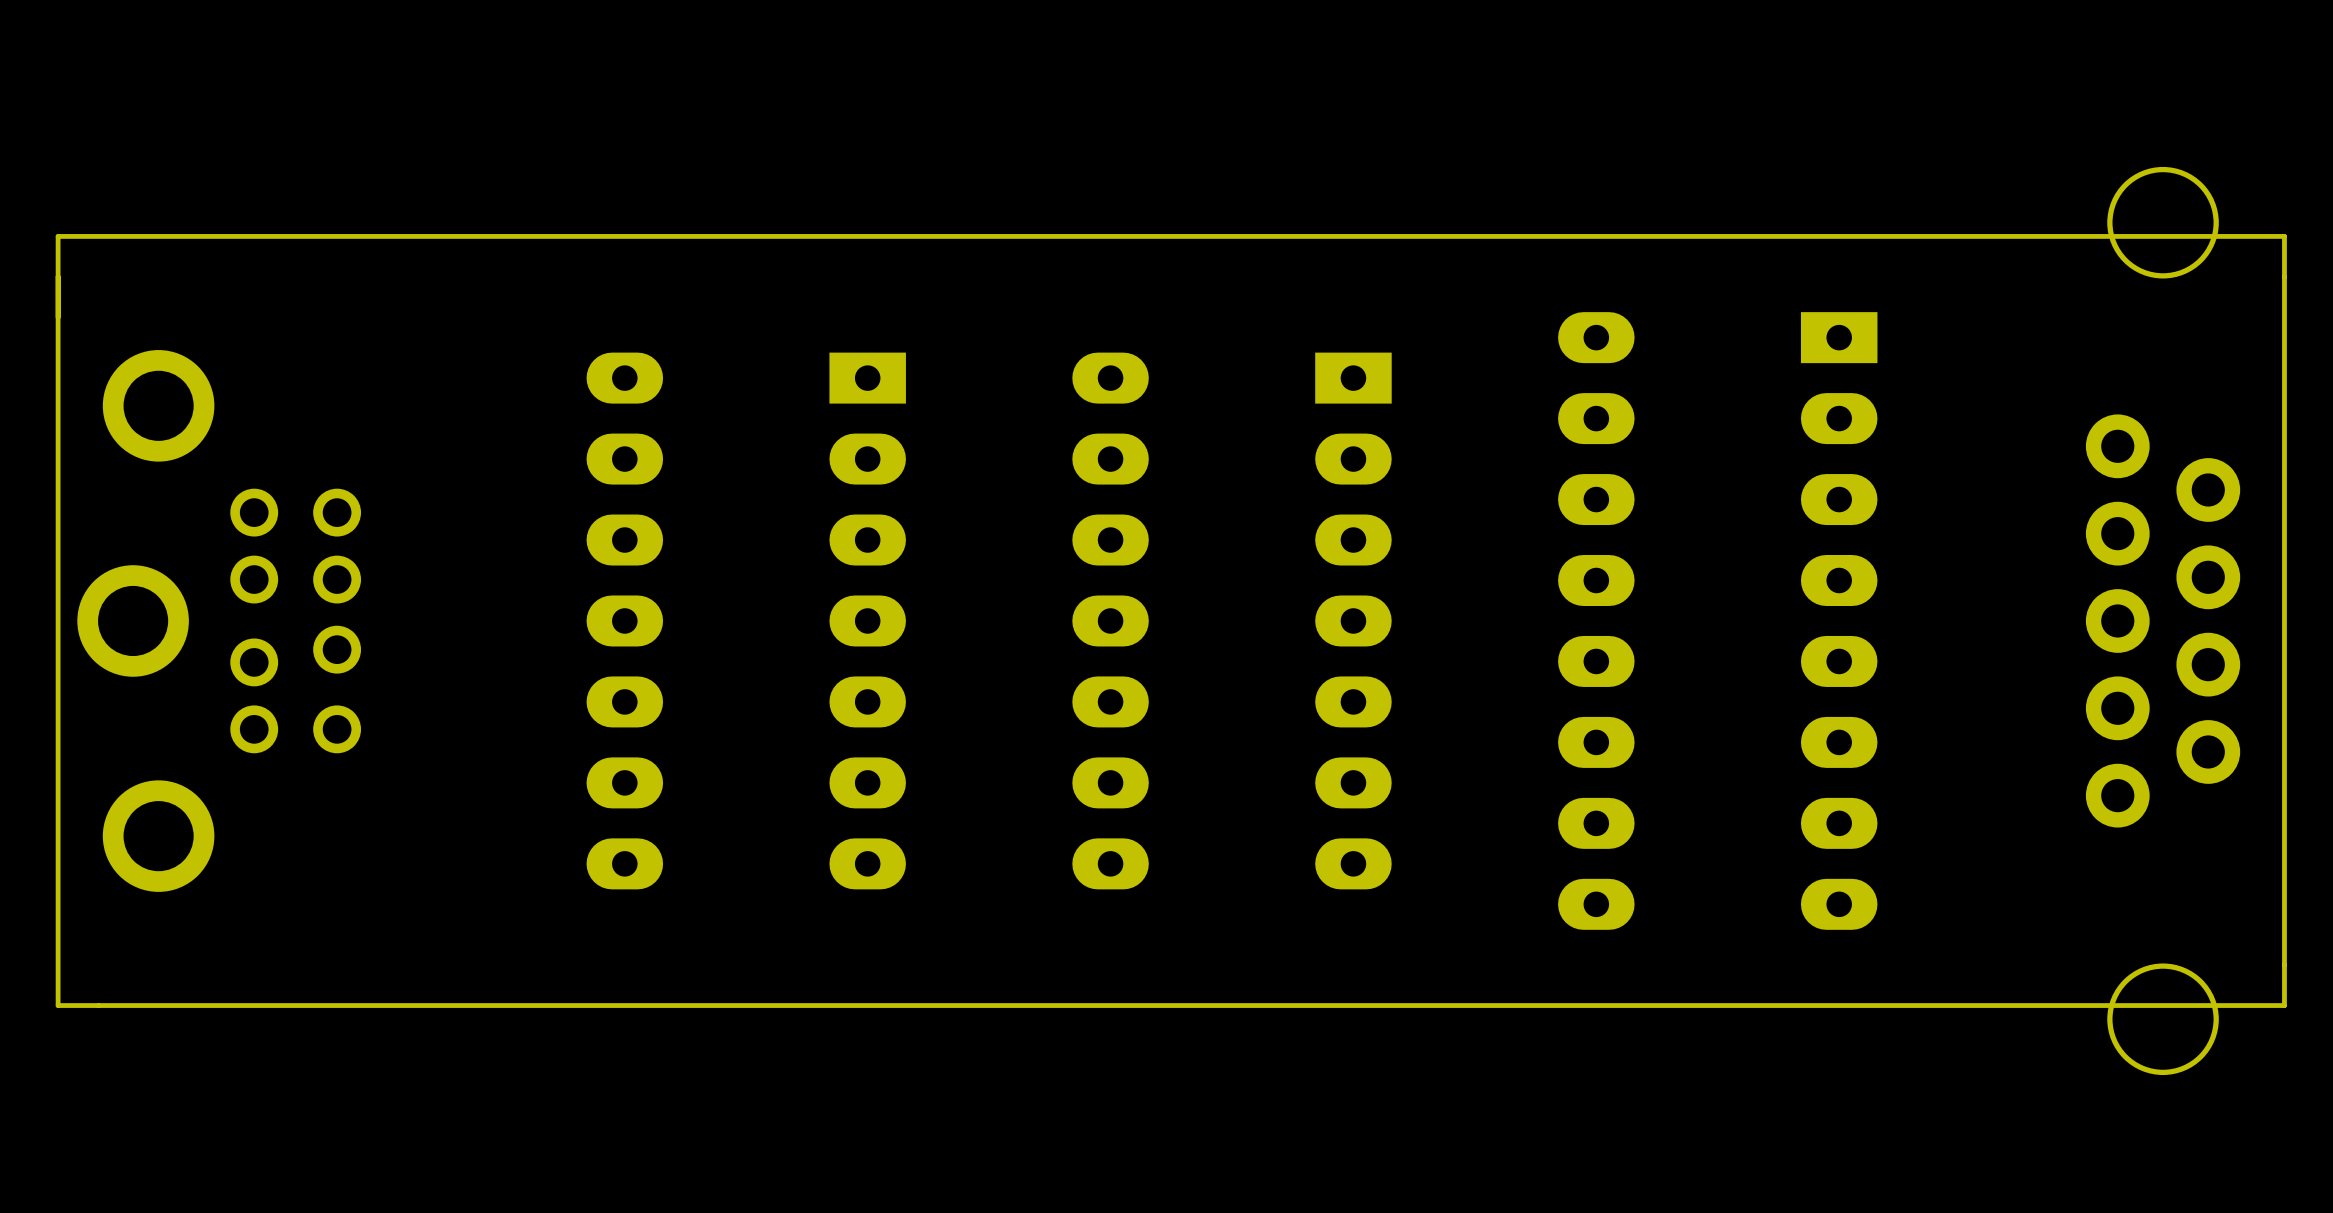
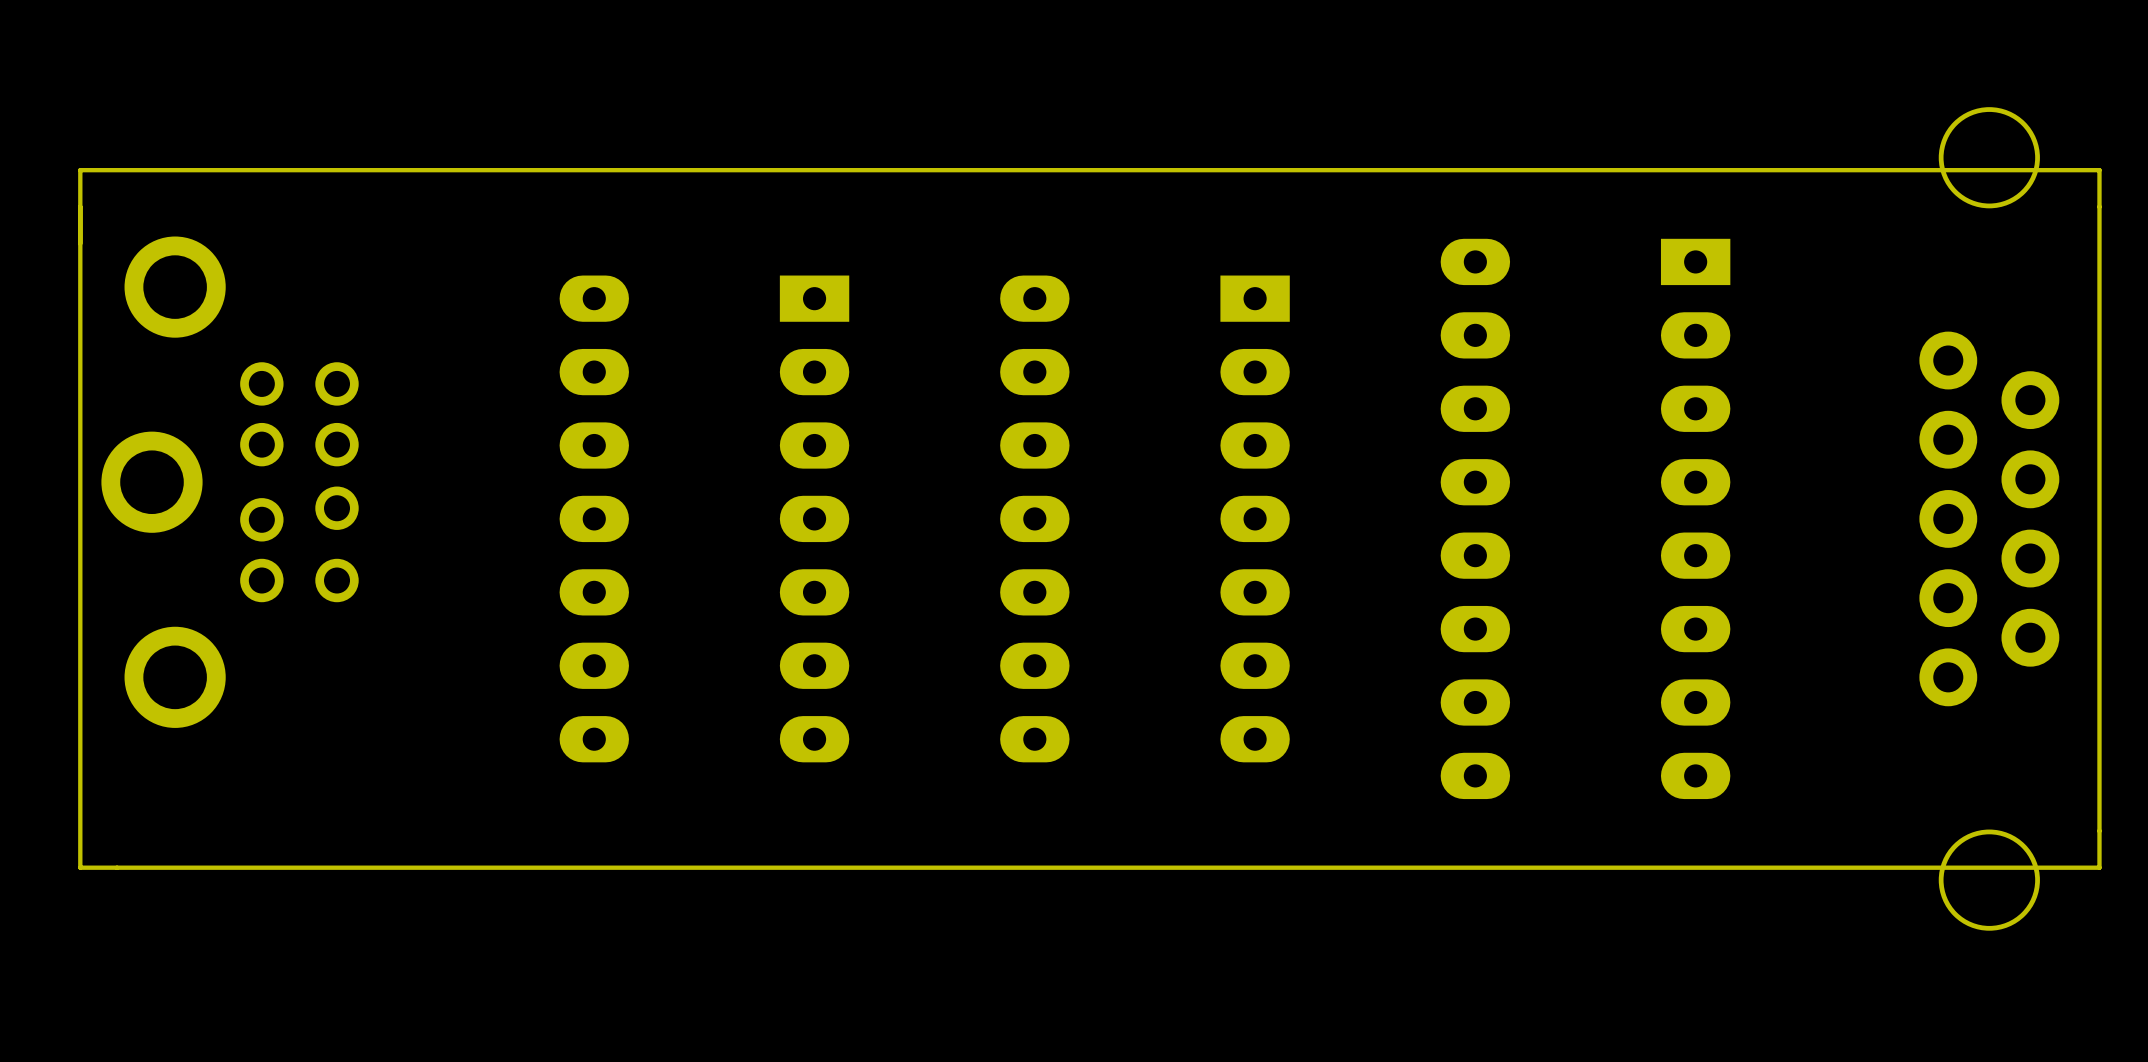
part position: (219, 620) -> (230, 482)

